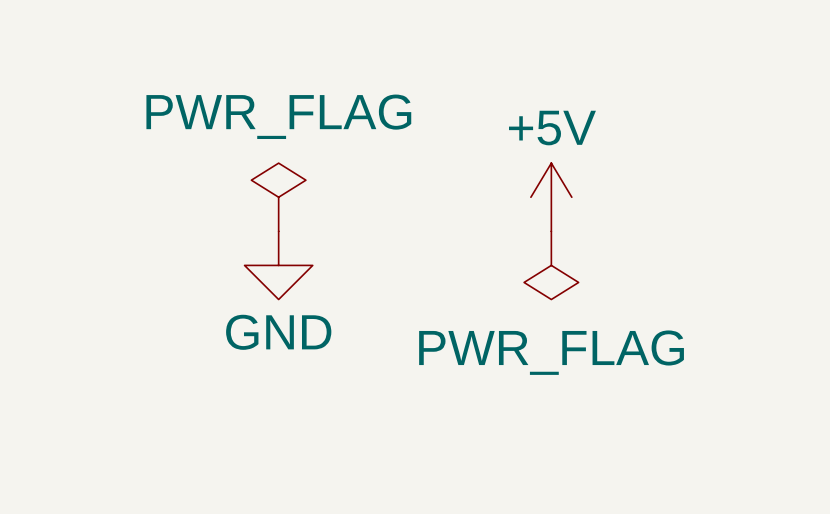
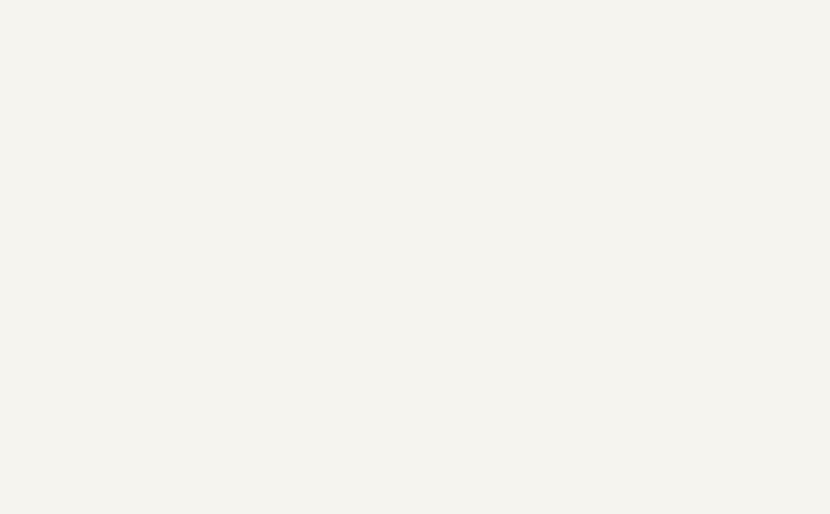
power symbol: PWR_FLAG (278, 197) -> none
power symbol: +5V (551, 197) -> none
power symbol: GND (278, 265) -> none
power symbol: PWR_FLAG (551, 265) -> none

